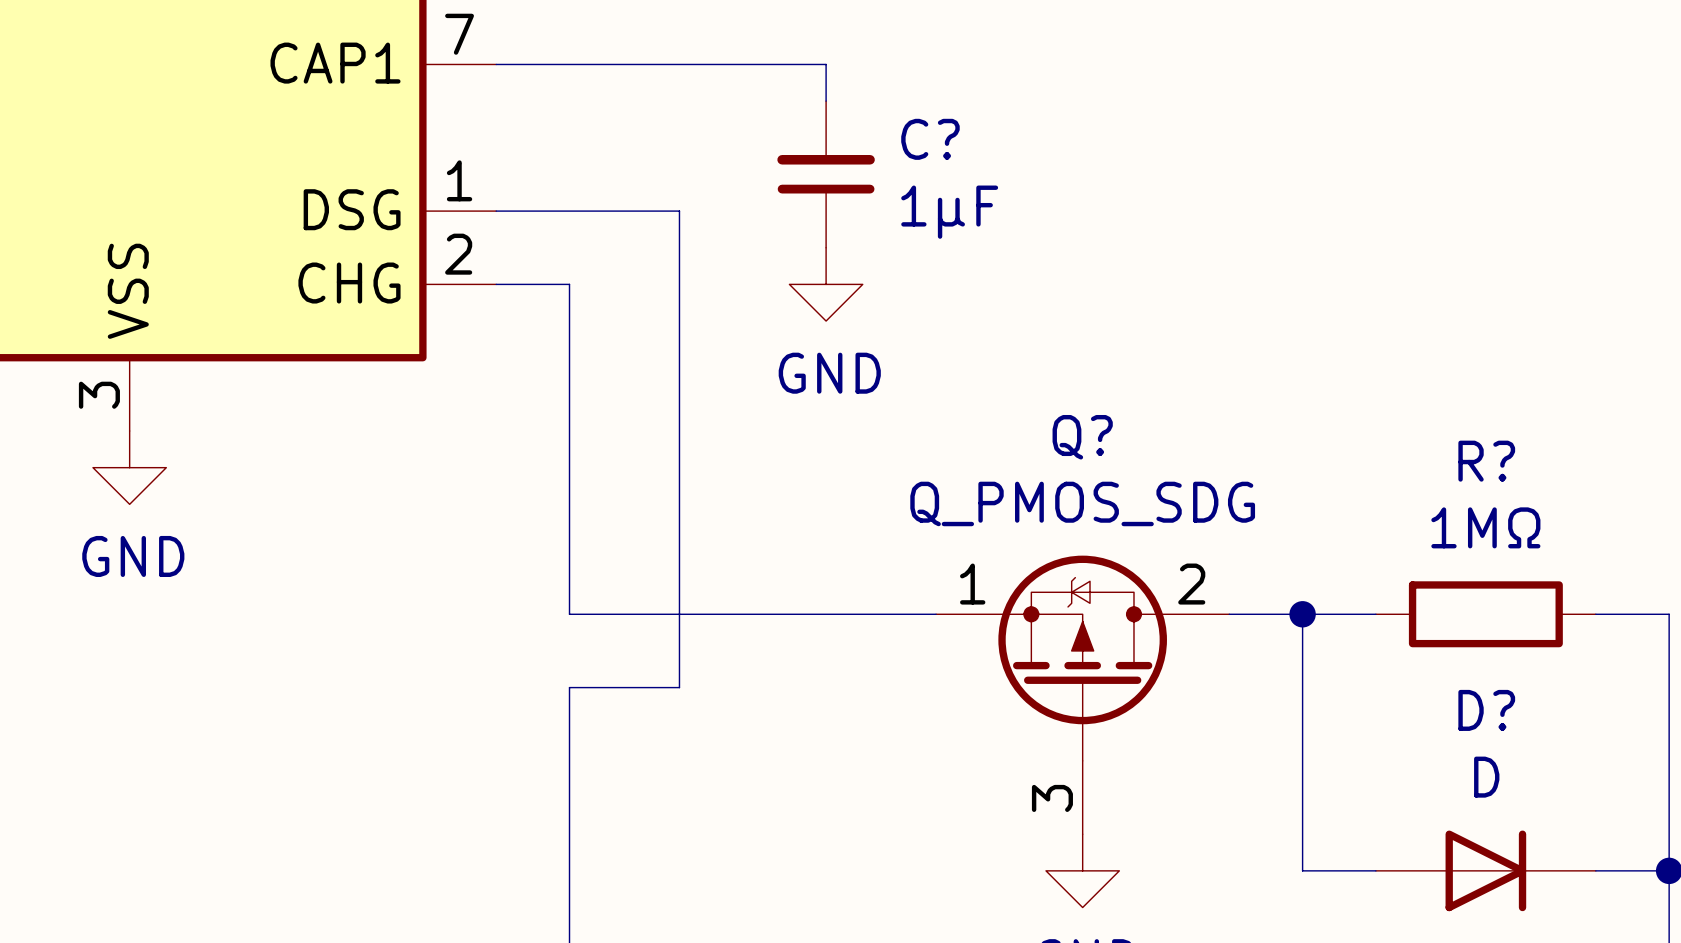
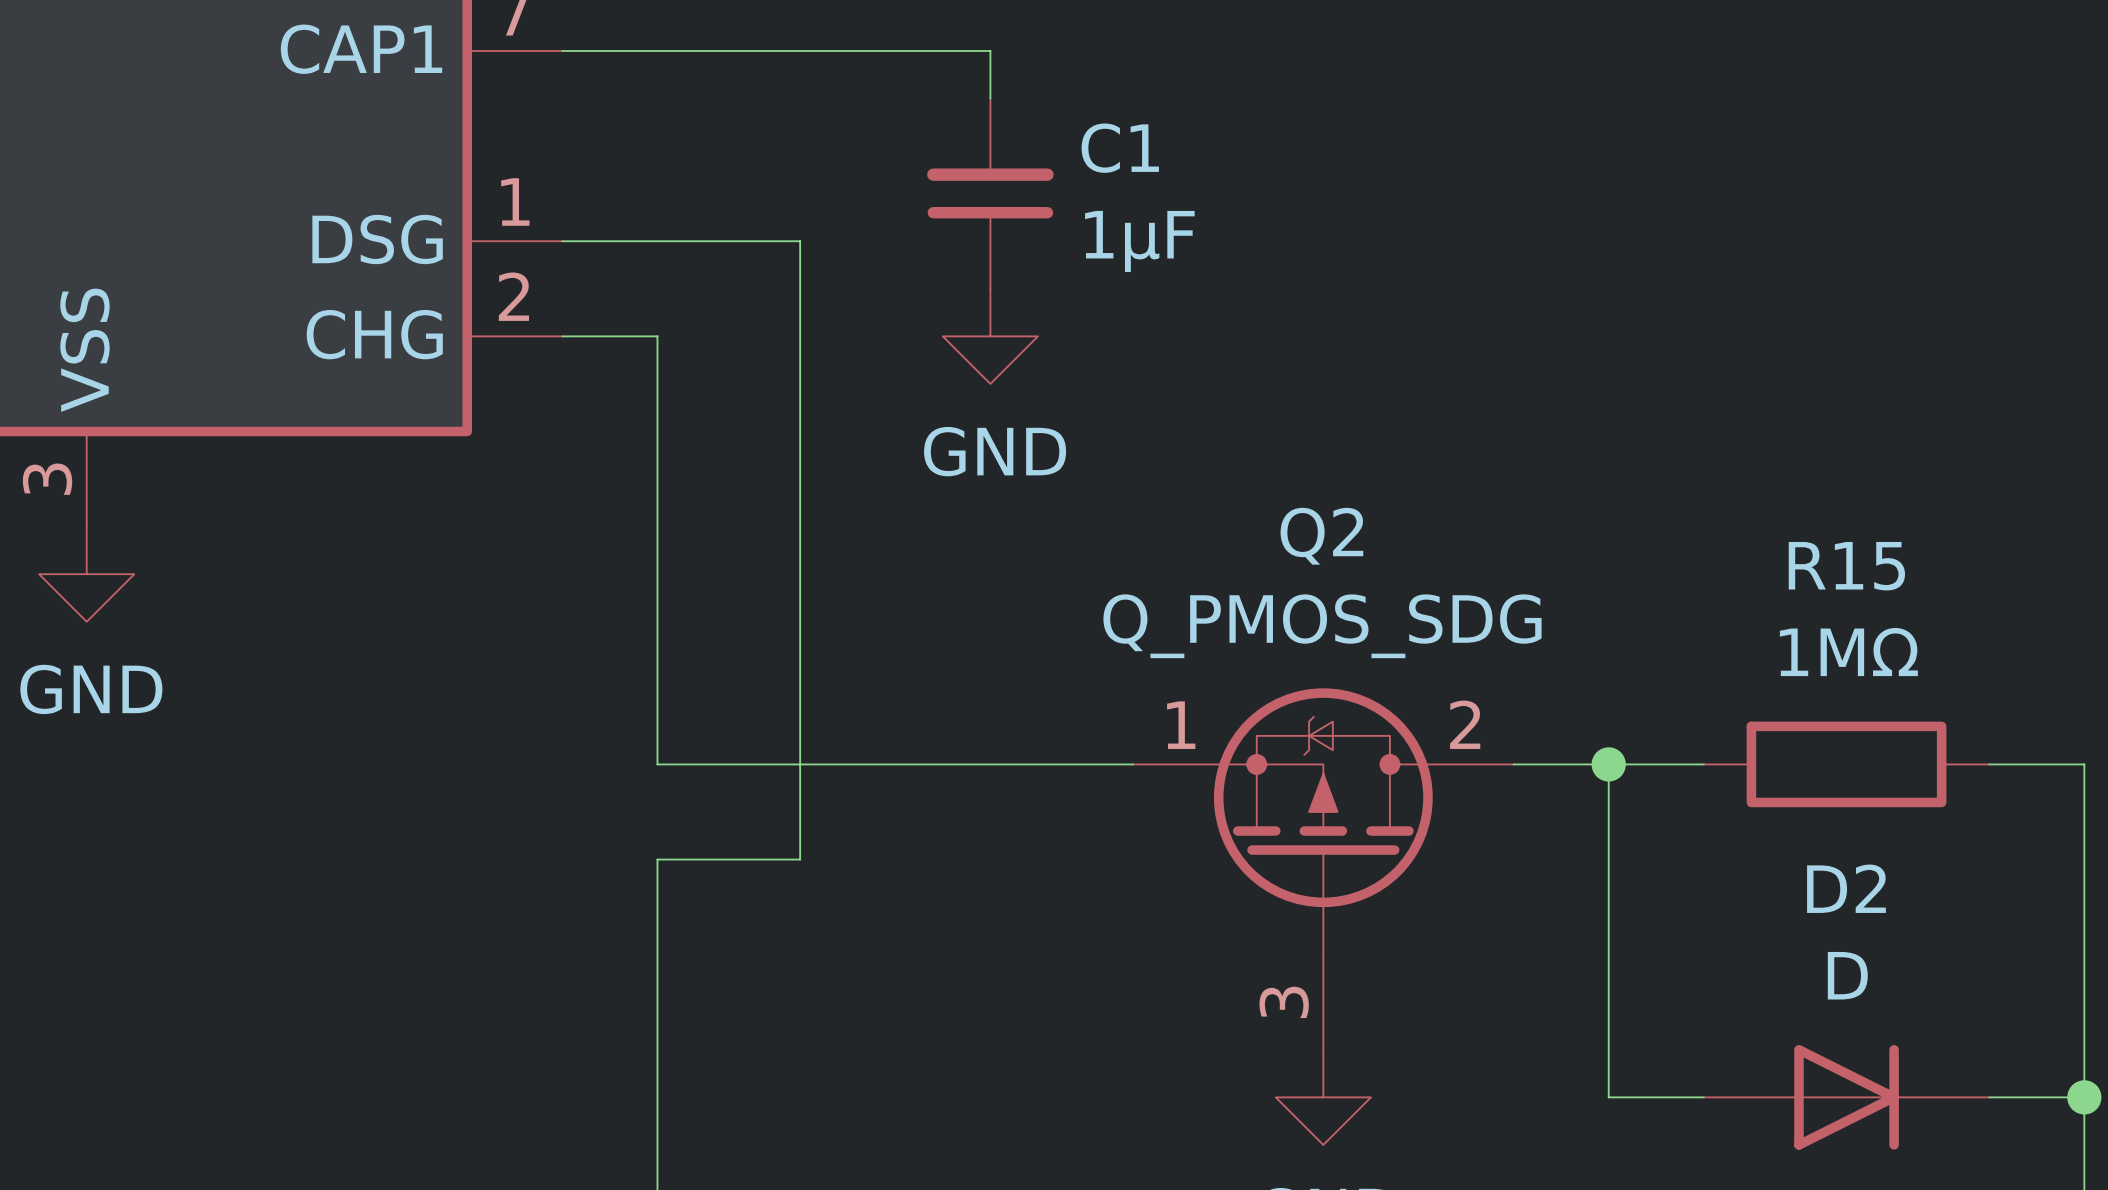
C? name: C? (930, 139) -> C1 (1120, 148)
Q? name: Q? (1082, 437) -> Q2 (1321, 536)
R? name: R? (1486, 461) -> R15 (1846, 566)
D? name: D? (1486, 710) -> D2 (1846, 888)

